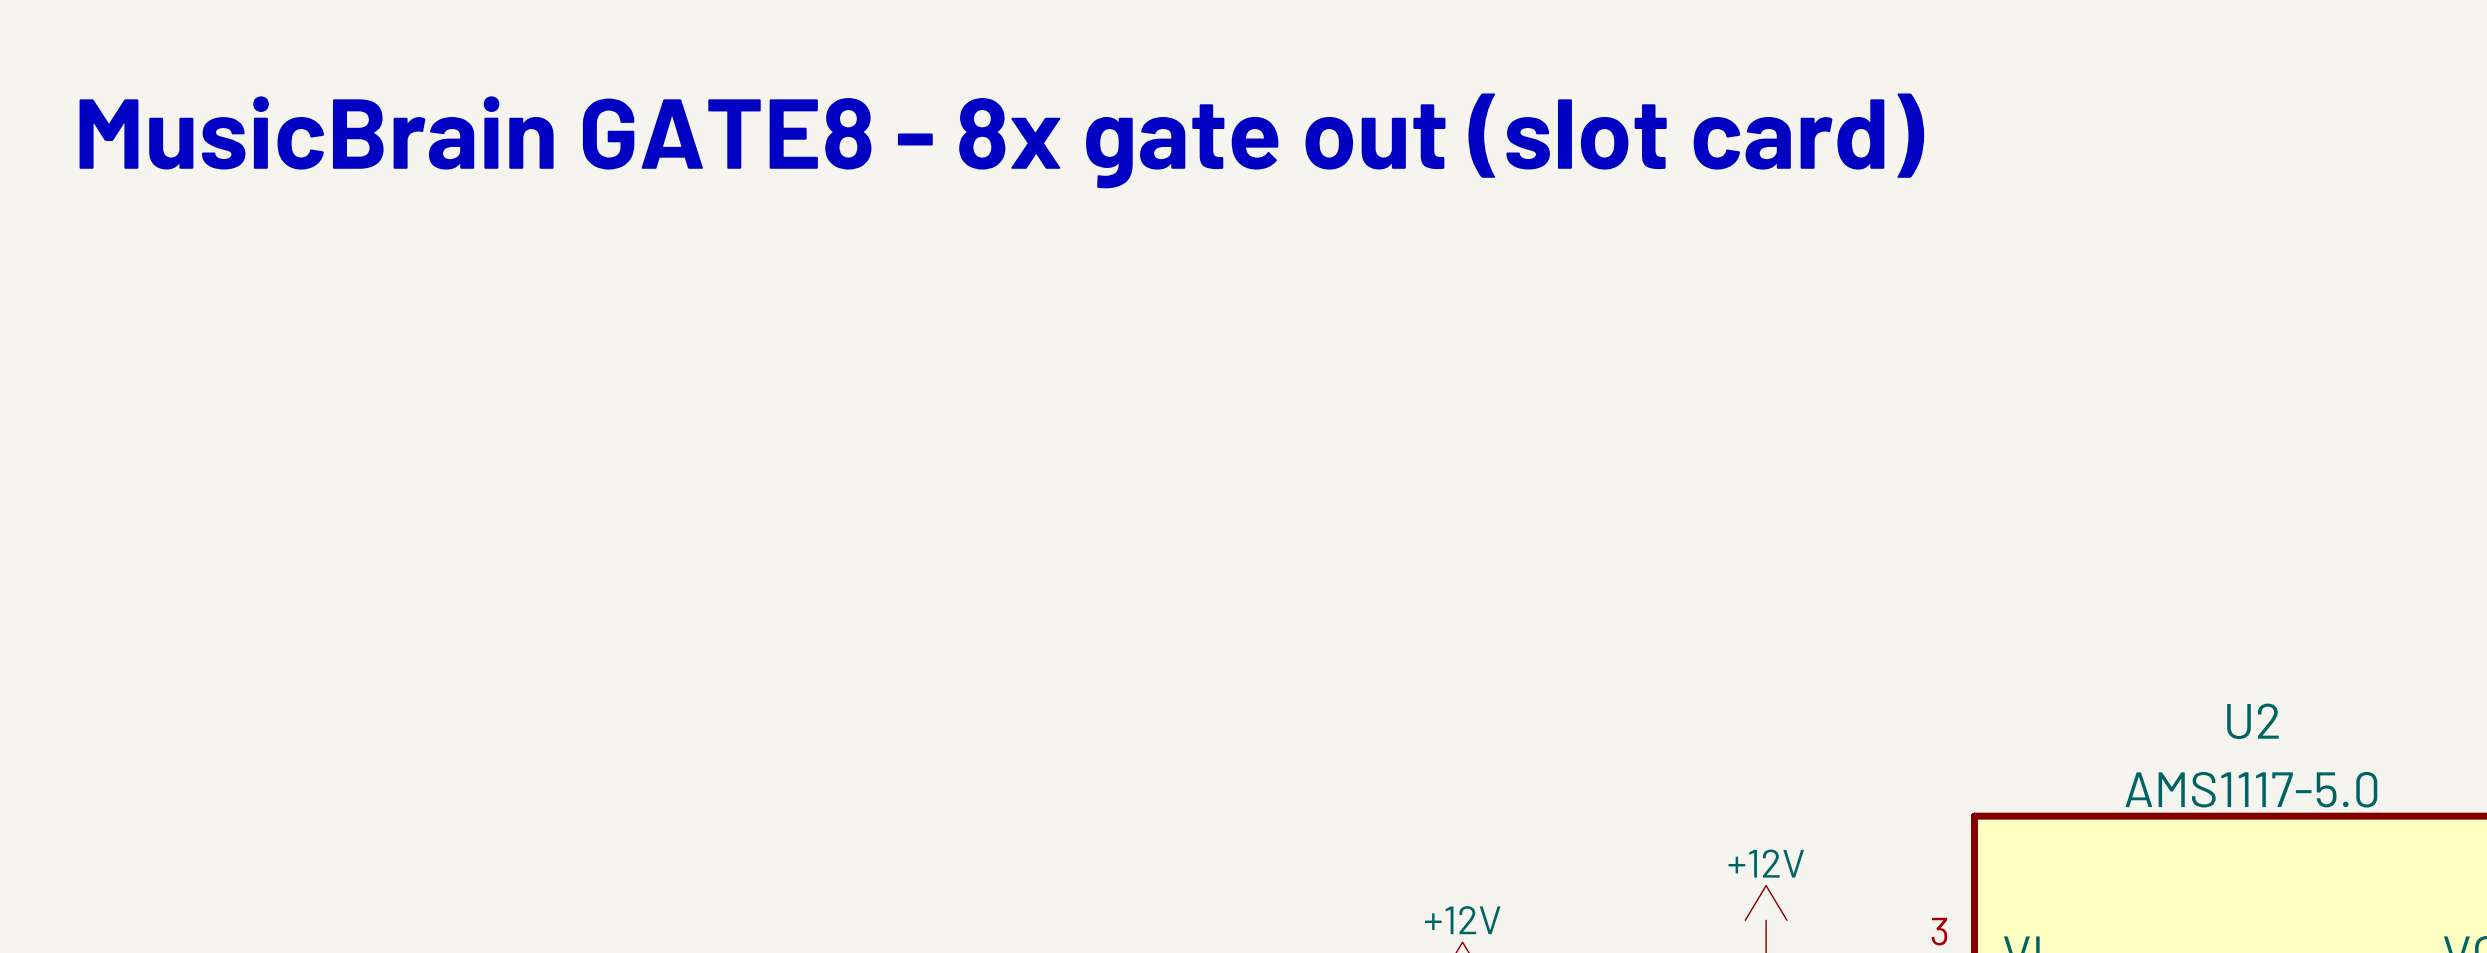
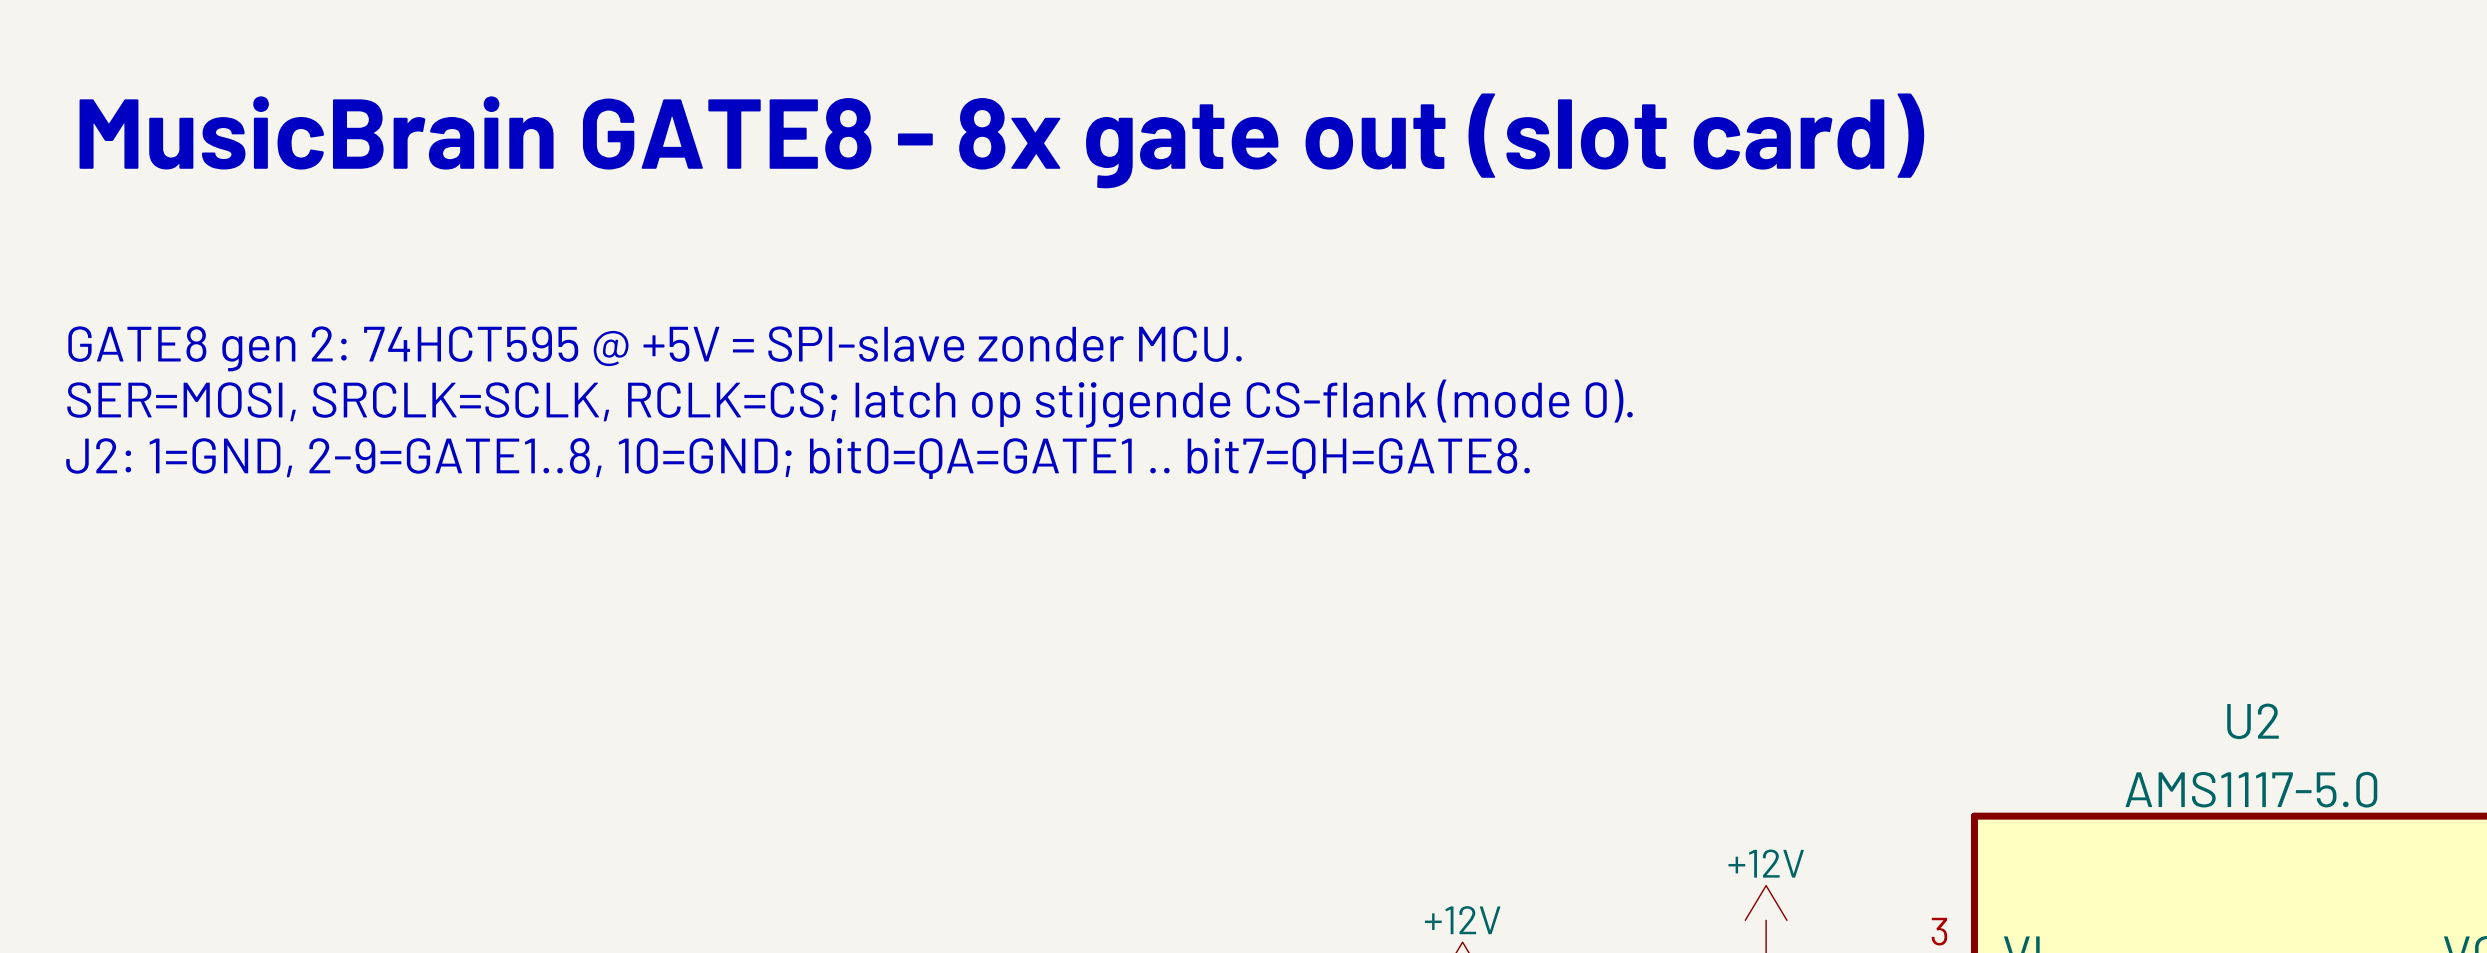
text: none -> GATE8 gen 2: 74HCT595 @ +5V = SPI-slave zonder MCU. (655, 348)
text: none -> SER=MOSI, SRCLK=SCLK, RCLK=CS; latch op stijgende CS-flank (mode 0). (850, 403)
text: none -> J2: 1=GND, 2-9=GATE1..8, 10=GND; bit0=QA=GATE1 .. bit7=QH=GATE8. (798, 458)

